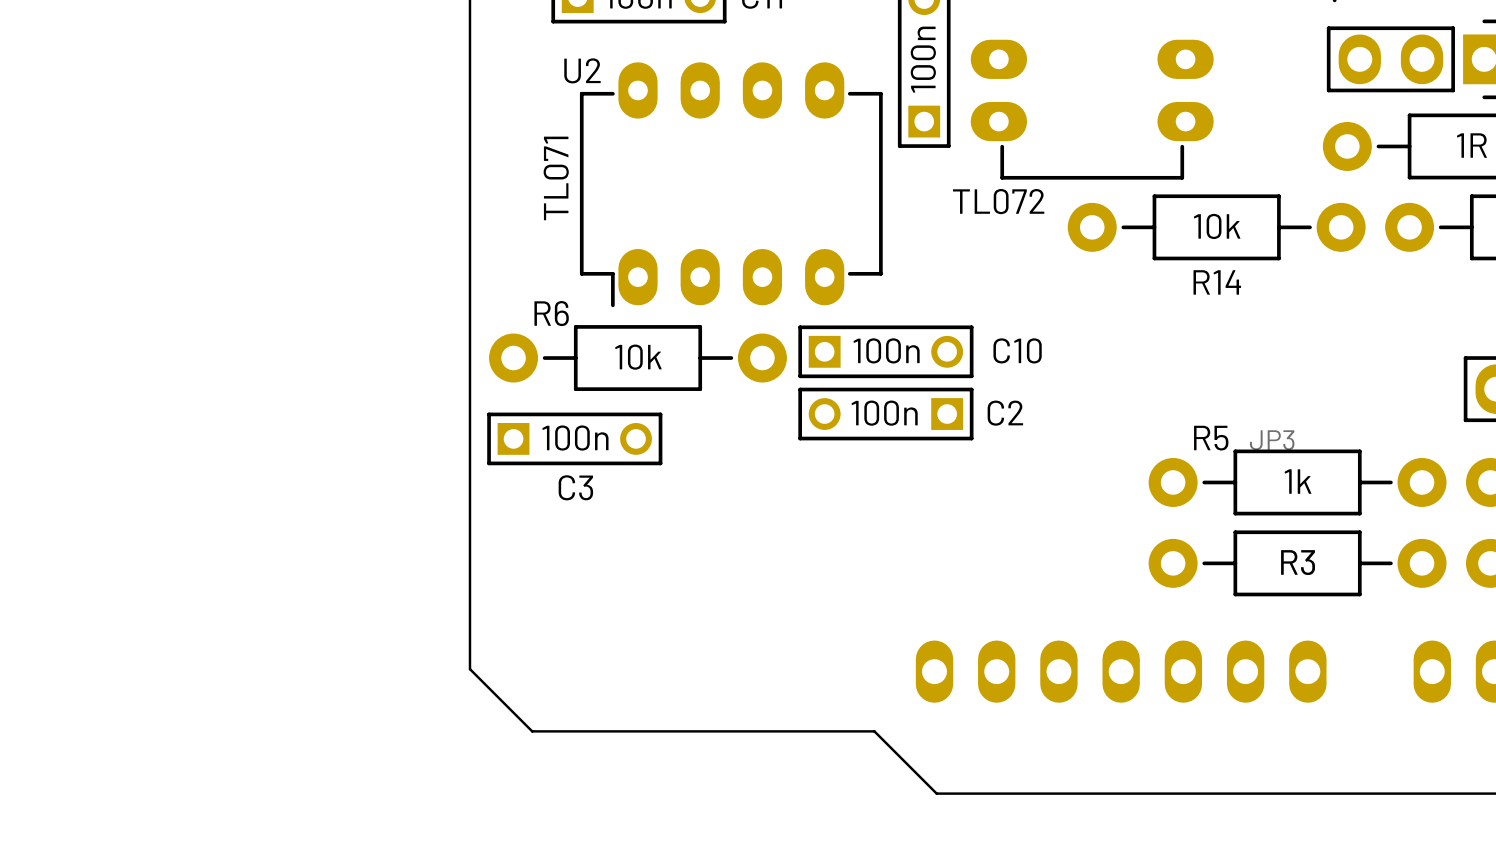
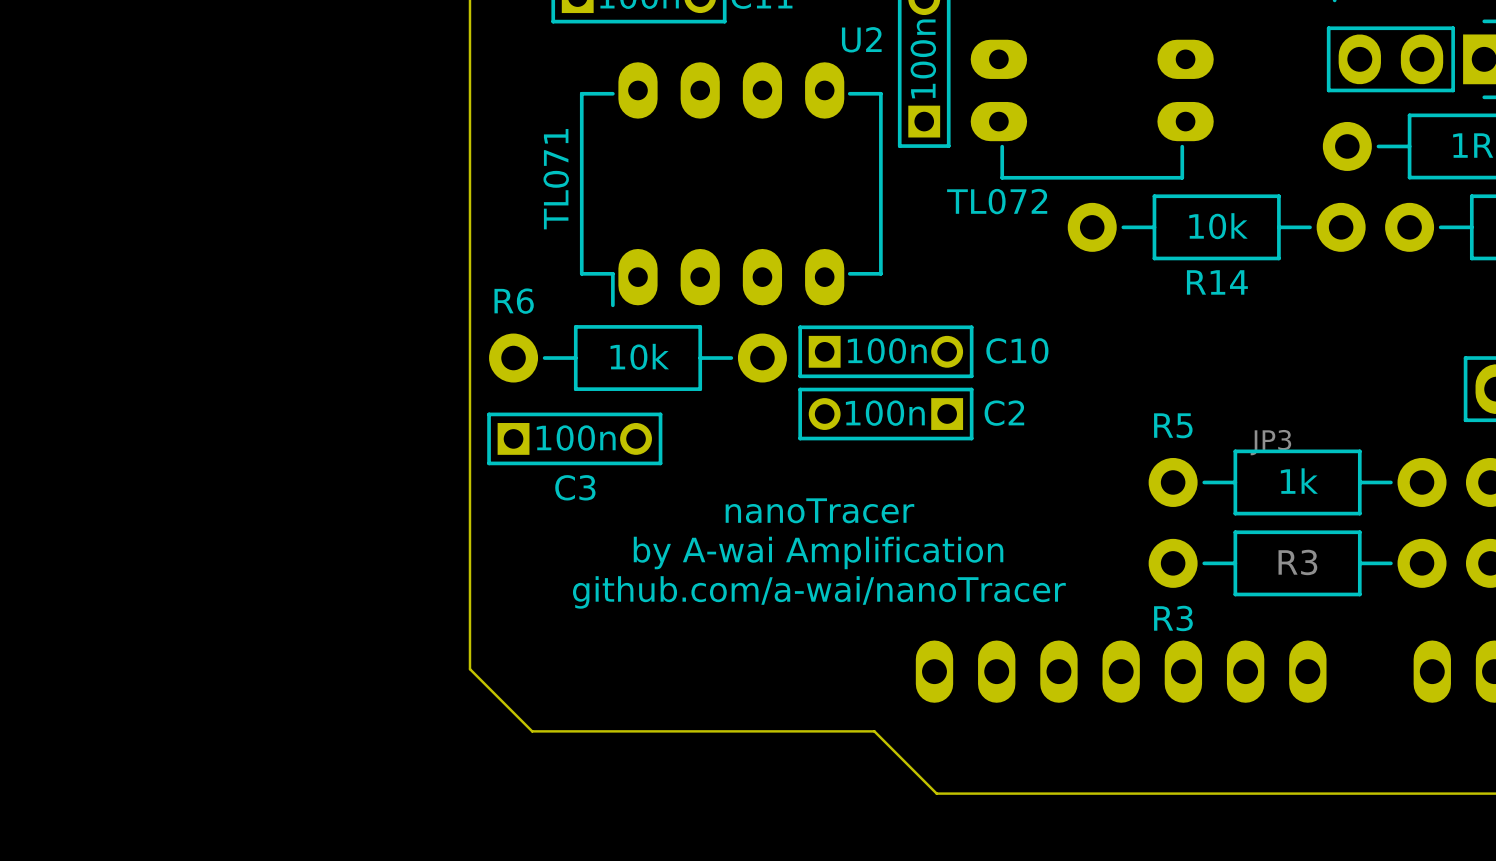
U2 name position: U2 (582, 70) -> U2 (861, 39)
R6 name position: R6 (551, 313) -> R6 (514, 301)
R5 name position: R5 (1211, 438) -> R5 (1173, 425)
text: none -> nanoTracer (819, 510)
text: none -> by A-wai Amplification (818, 552)
R3 name position: R3 (1298, 562) -> R3 (1173, 618)
text: none -> github.com/a-wai/nanoTracer (819, 592)

